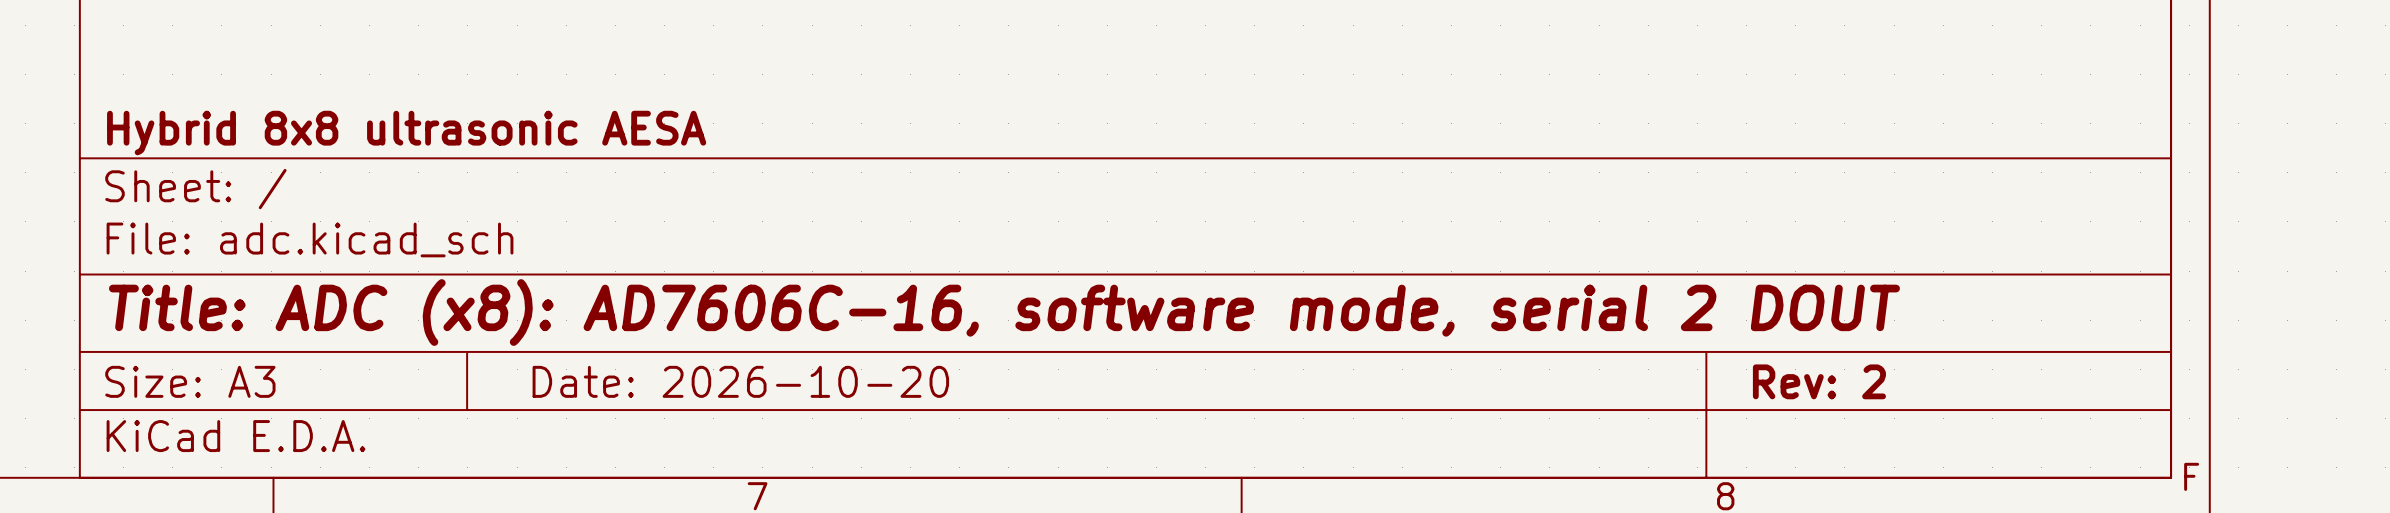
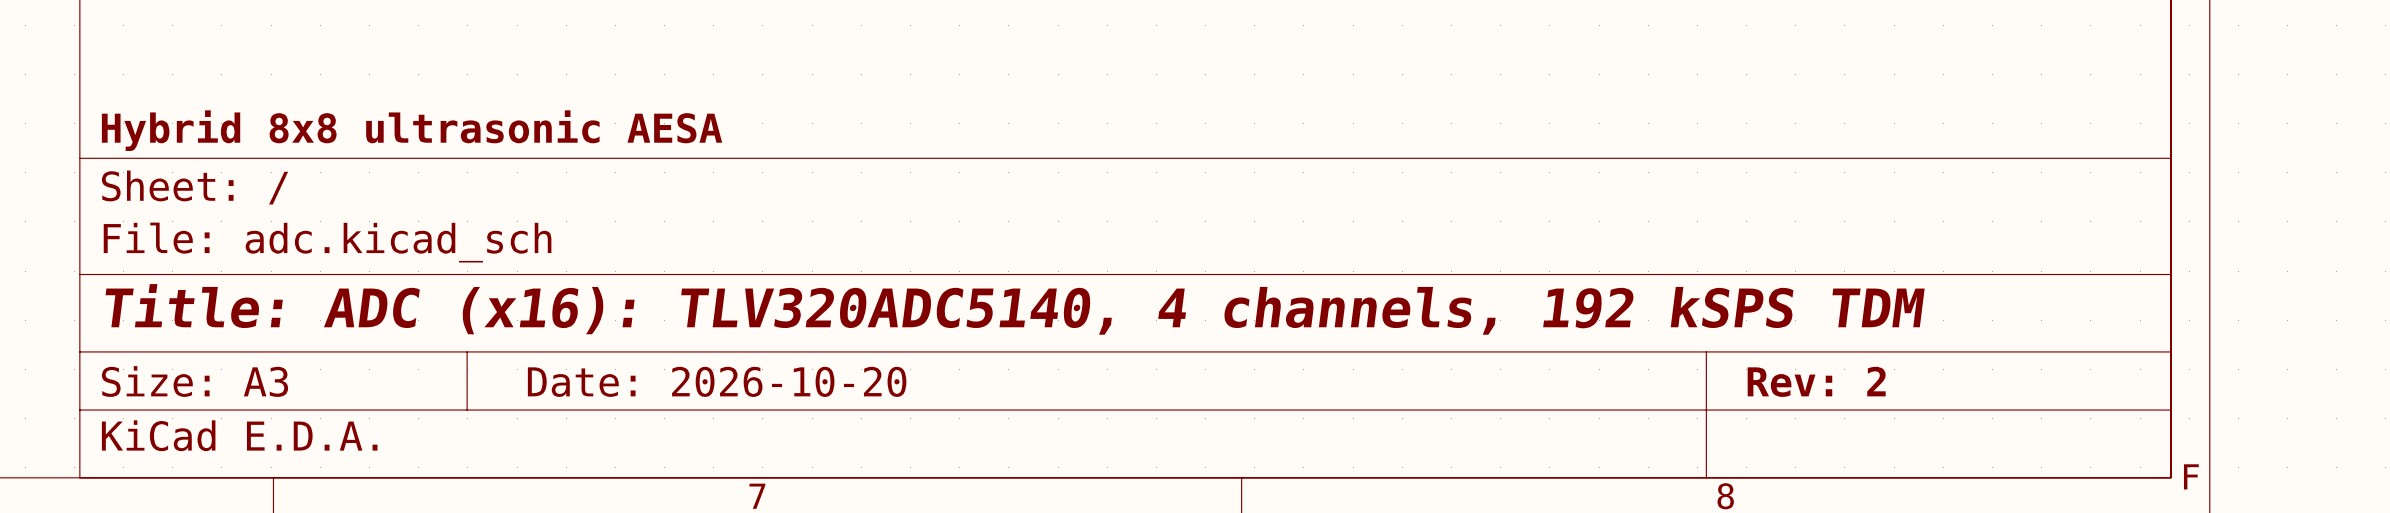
title block: Title: ADC (x8): AD7606C-16, software mode, serial 2 DOUT (1004, 312) -> Title: ADC (x16): TLV320ADC5140, 4 channels, 192 kSPS TDM (1015, 309)

